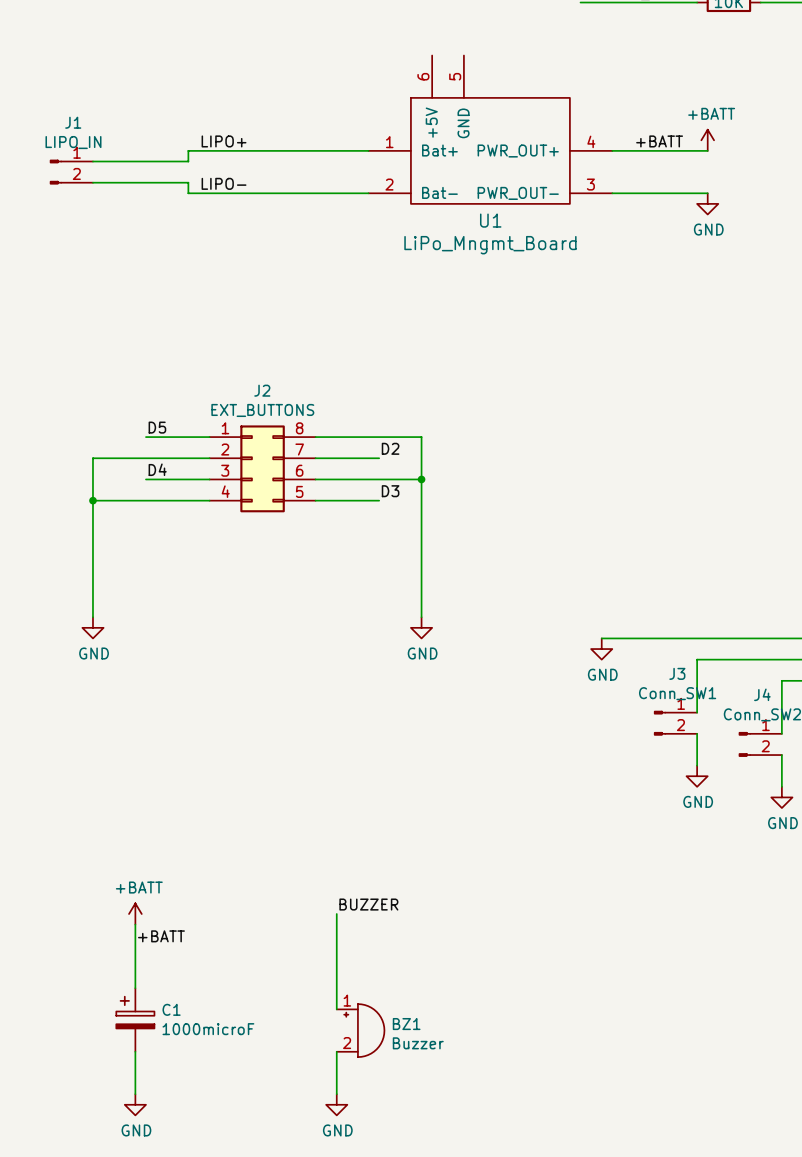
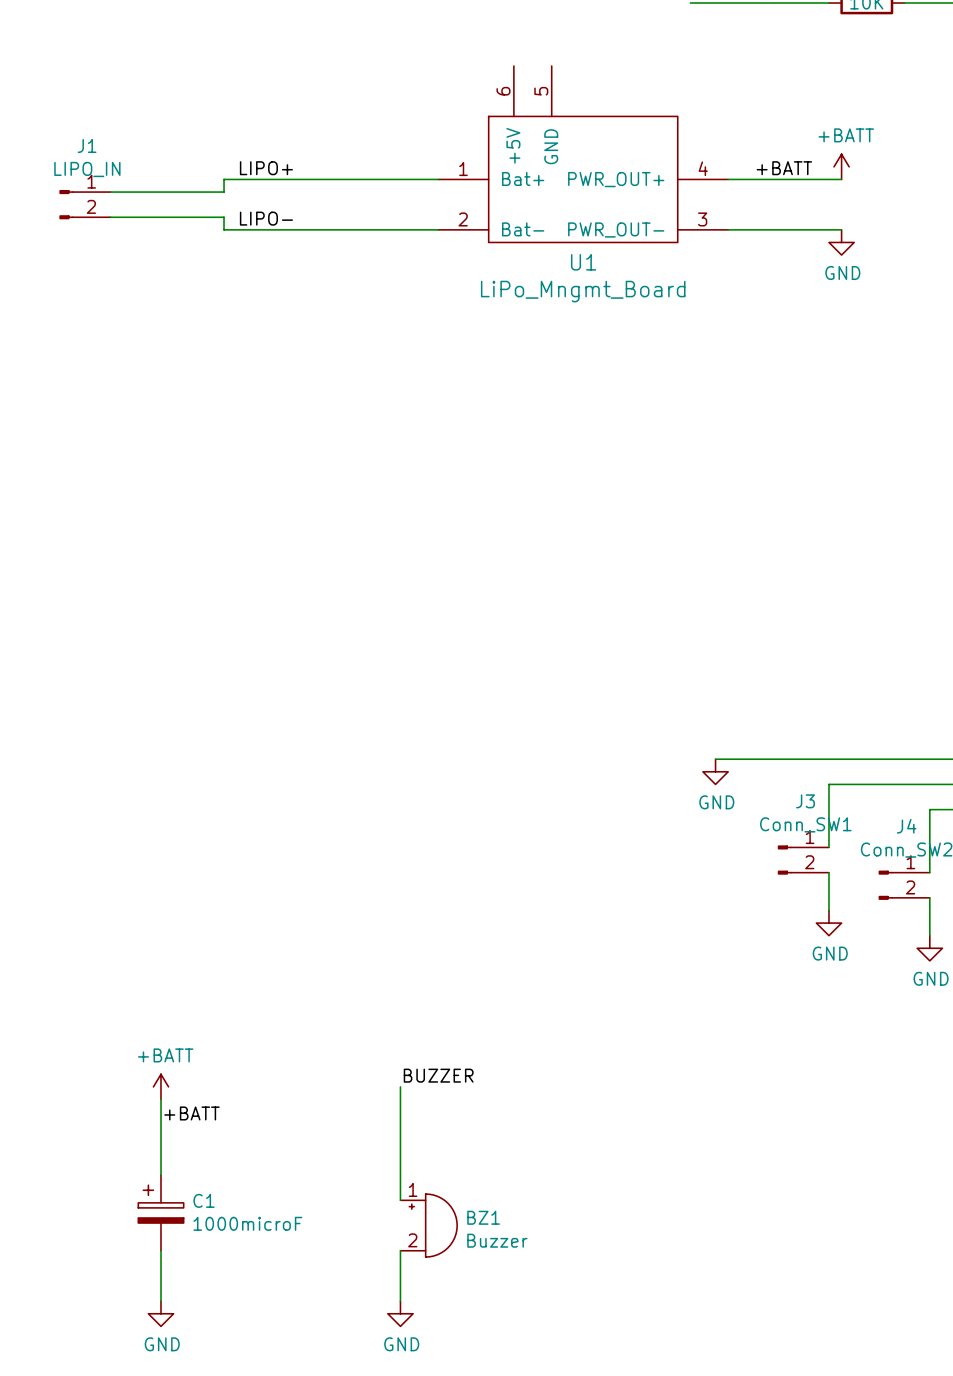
label: D5 (157, 427) -> none
wire: (145, 437) (209, 437) -> none
wire: (315, 437) (421, 437) (421, 617) -> none
label: D2 (390, 448) -> none
wire: (209, 458) (92, 458) (92, 617) -> none
wire: (315, 458) (379, 458) -> none
J2: EXT_BUTTONS (262, 468) -> none
label: D4 (157, 469) -> none
wire: (145, 479) (209, 479) -> none
wire: (315, 479) (421, 479) -> none
junction: (421, 479) -> none
label: D3 (390, 491) -> none
wire: (92, 500) (209, 500) -> none
junction: (92, 500) -> none
wire: (315, 500) (379, 500) -> none
power symbol: GND (92, 627) -> none
power symbol: GND (421, 627) -> none

